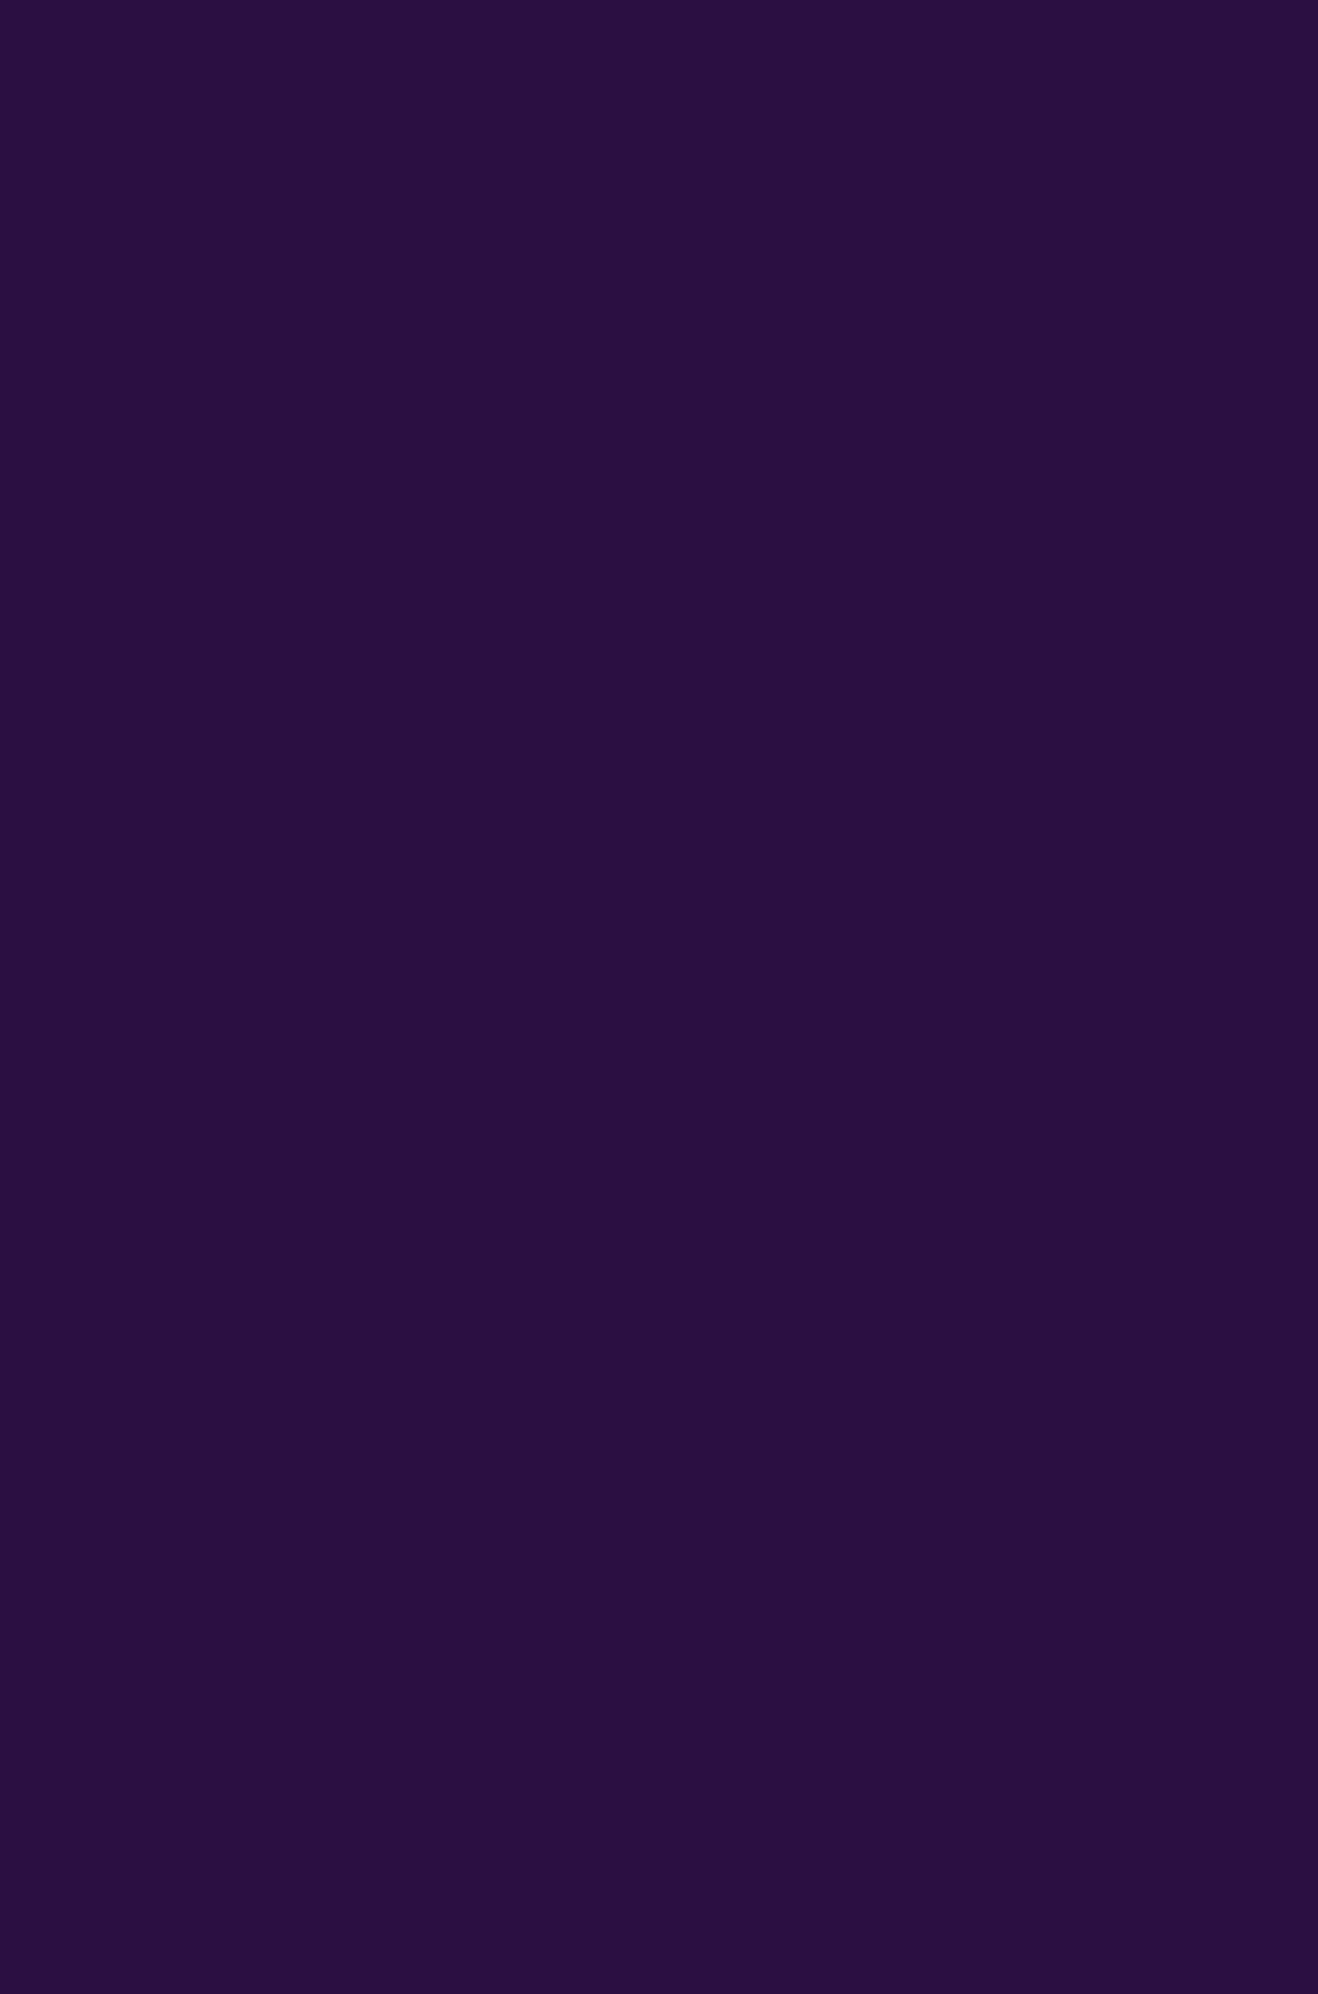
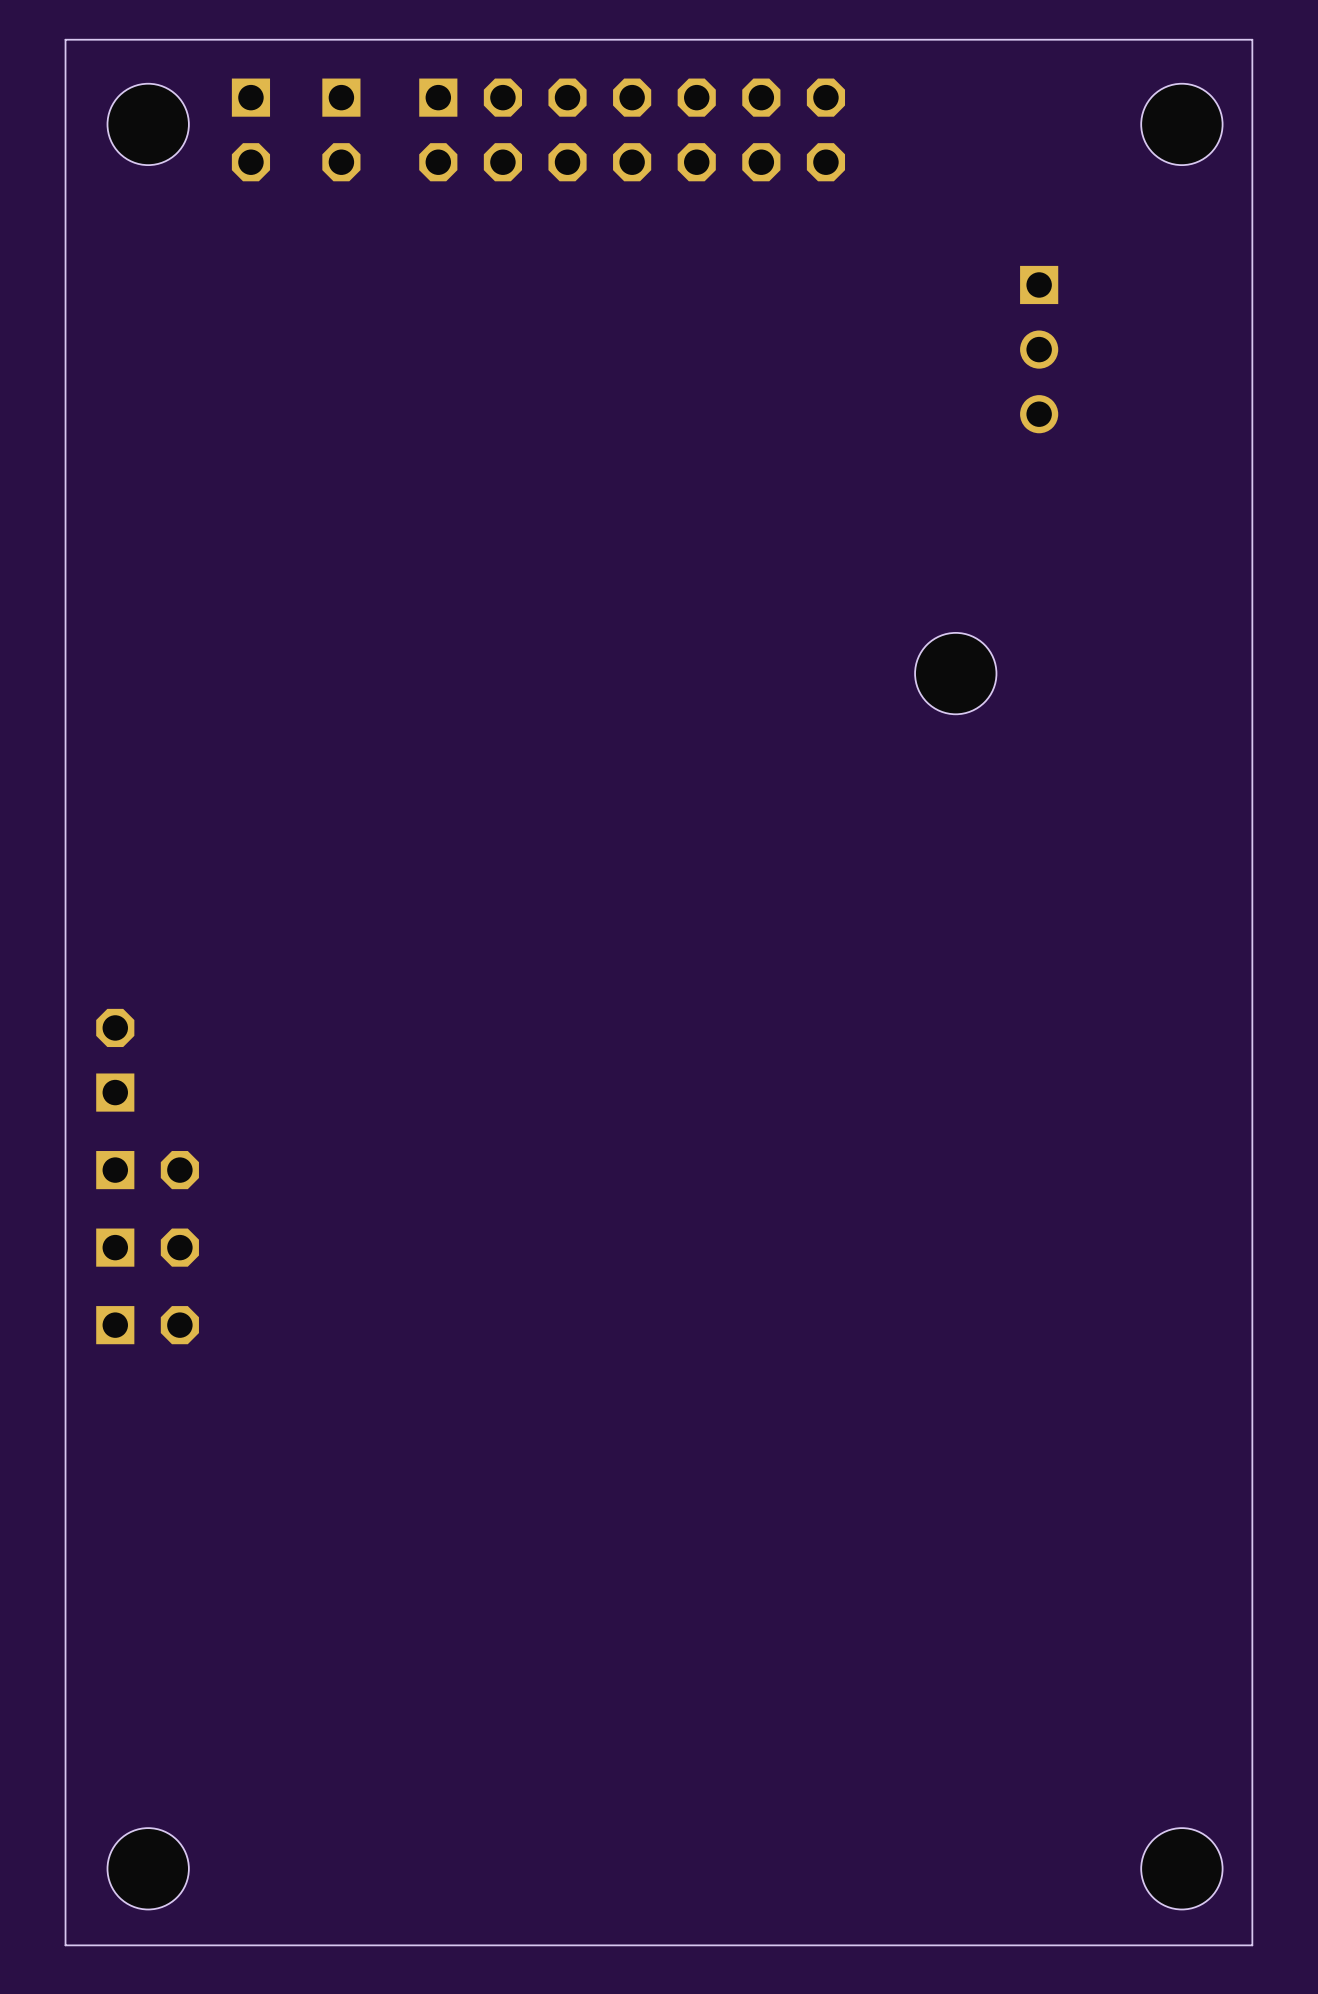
board edge: none -> (1252, 39) (65, 39) (65, 1945) (1252, 1945) (1252, 39)
hole: none -> (148, 124)
hole: none -> (1181, 124)
part: none -> (250, 129)
part: none -> (341, 129)
part: none -> (632, 129)
part: none -> (1039, 349)
hole: none -> (955, 673)
part: none -> (115, 1060)
part: none -> (147, 1170)
part: none -> (147, 1247)
part: none -> (147, 1325)
hole: none -> (148, 1868)
hole: none -> (1181, 1868)

